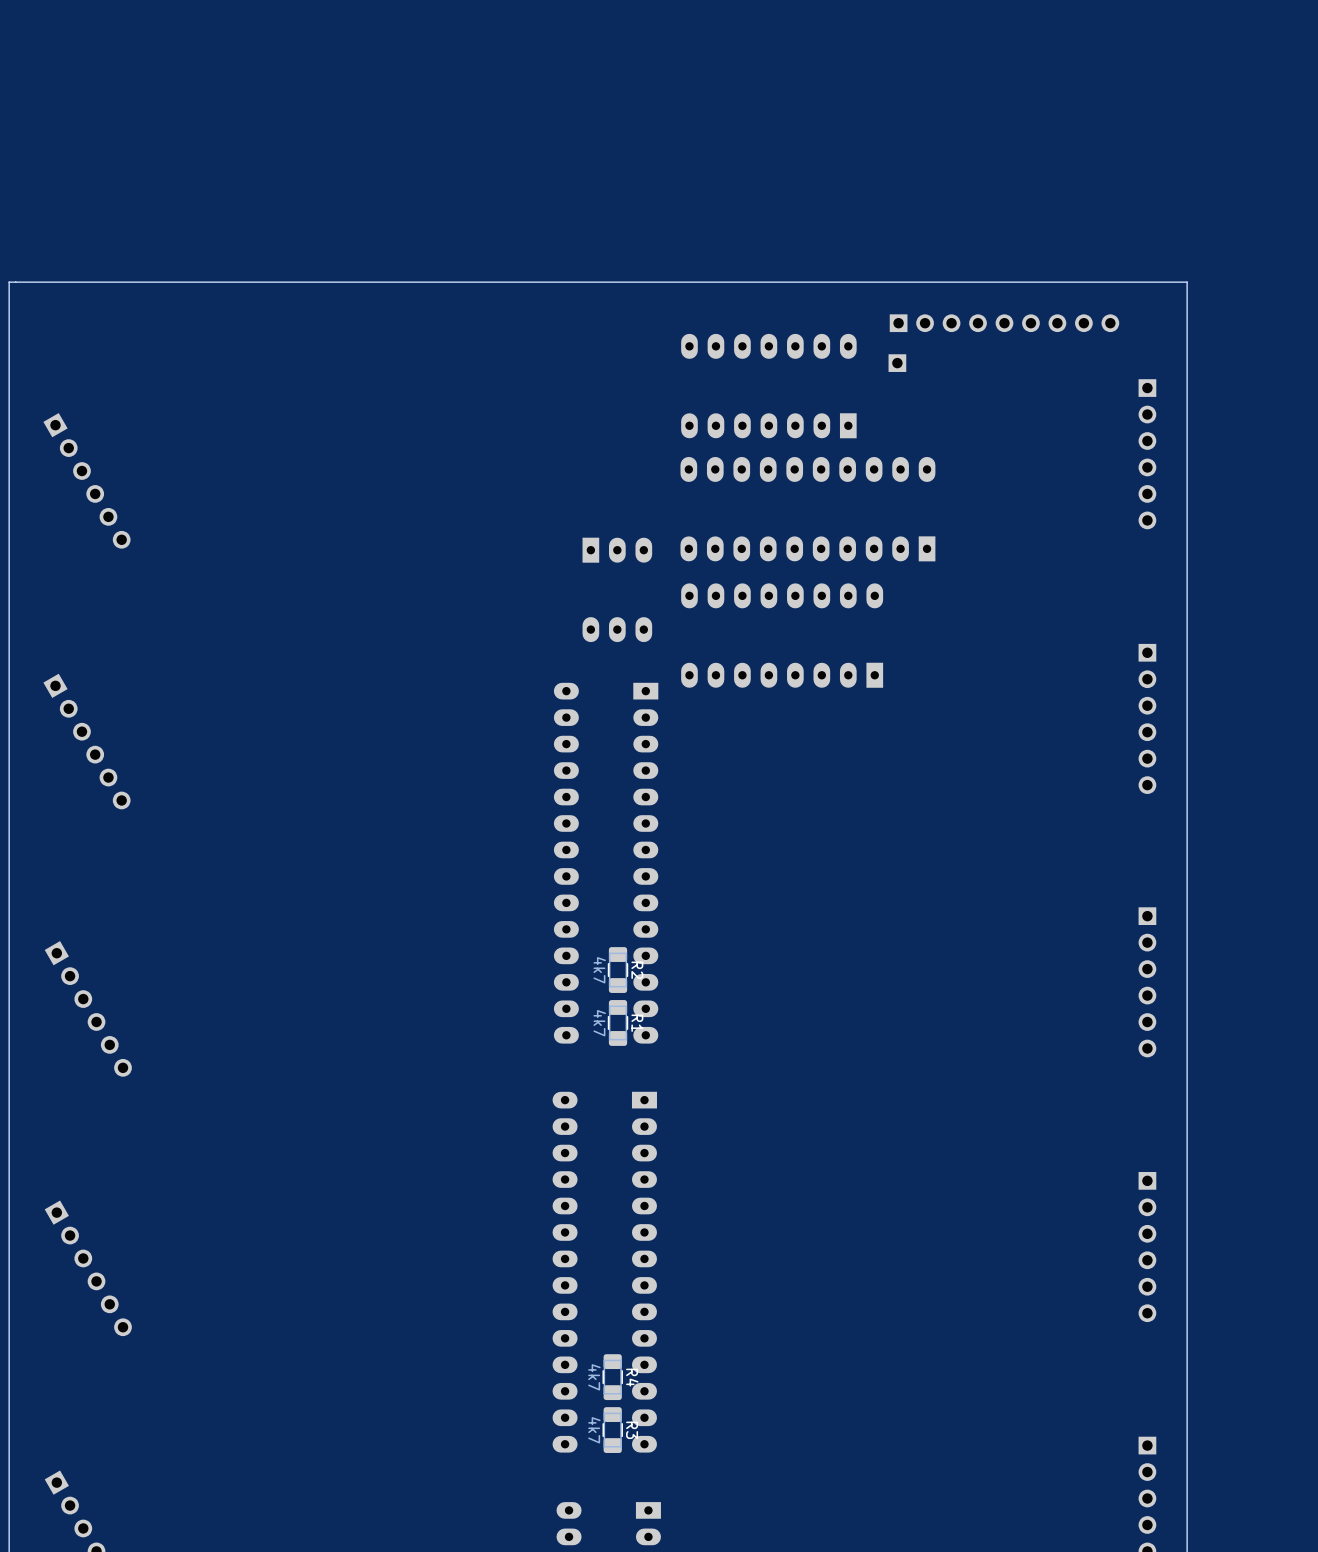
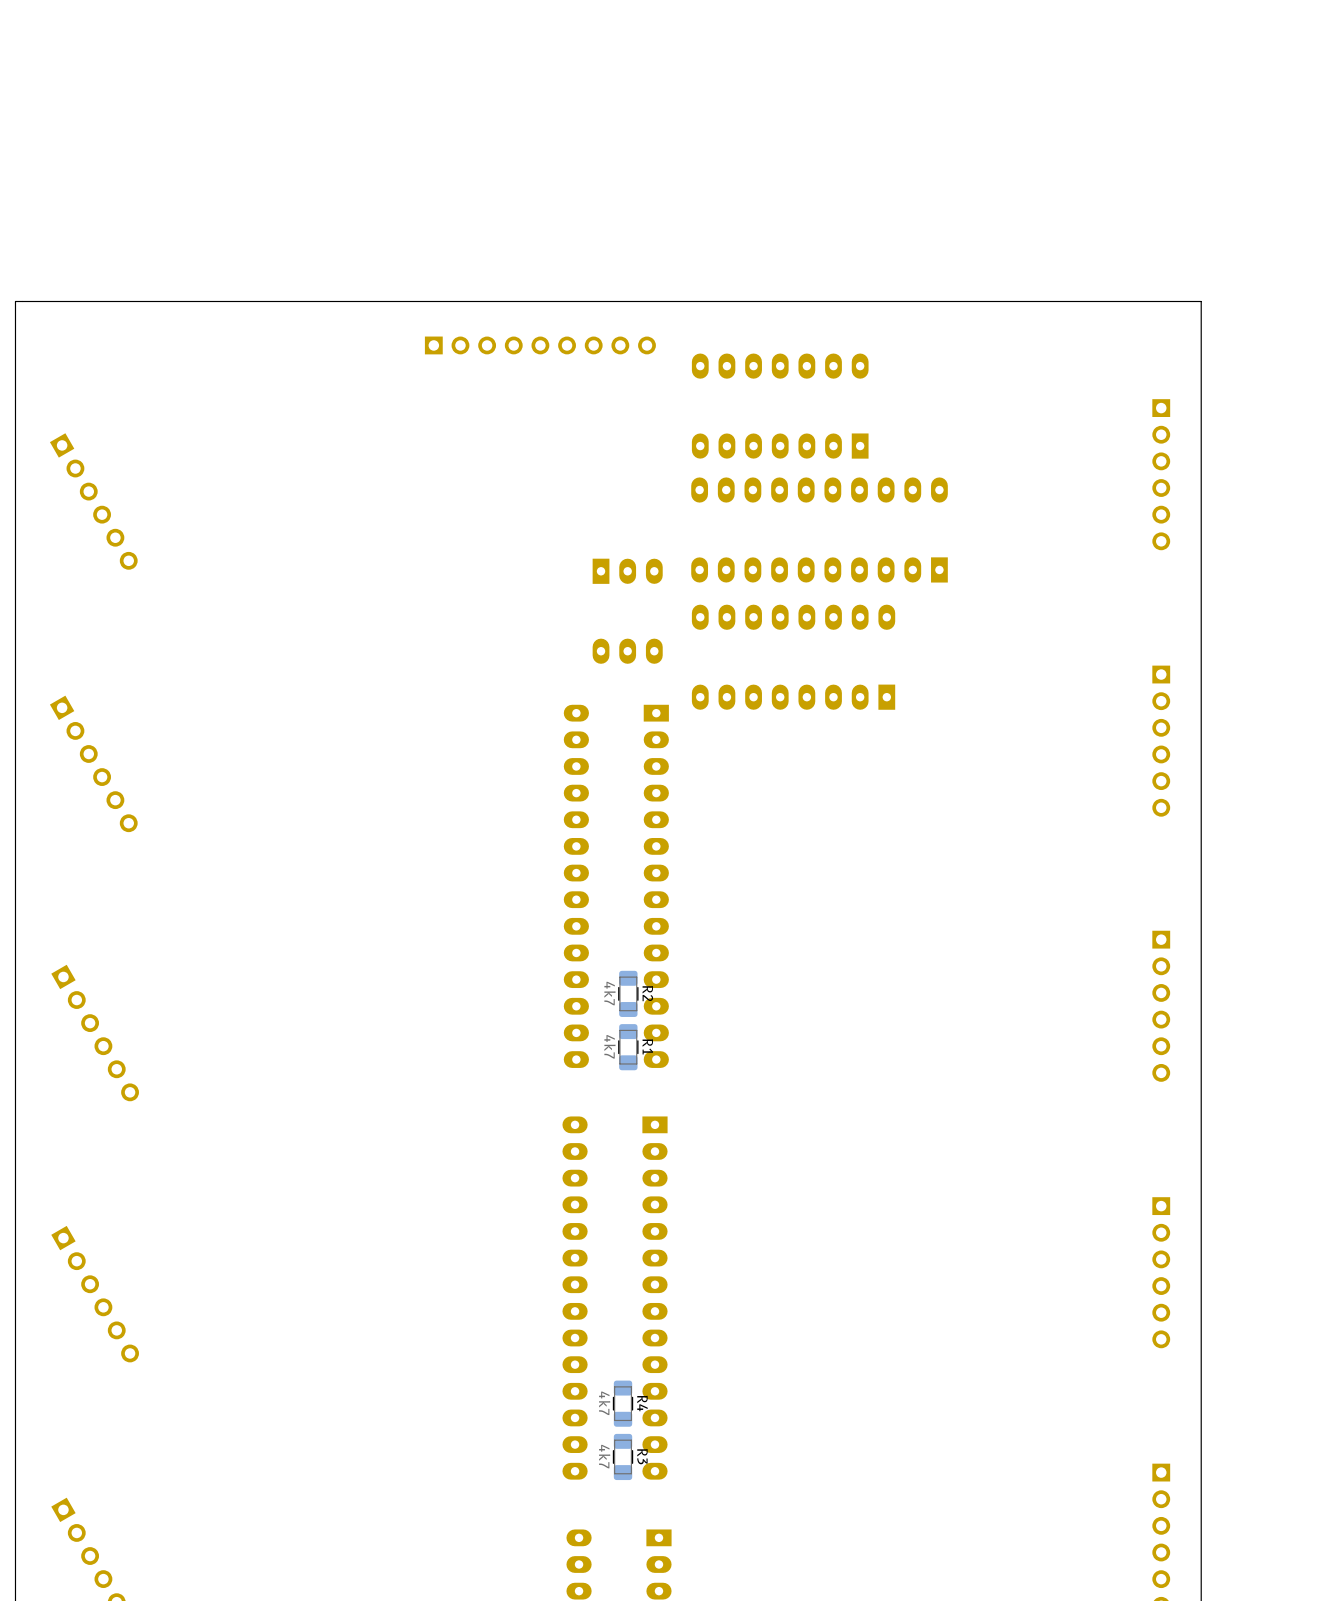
part: (1004, 323) -> none
part: none -> (540, 345)
part: (897, 363) -> none

